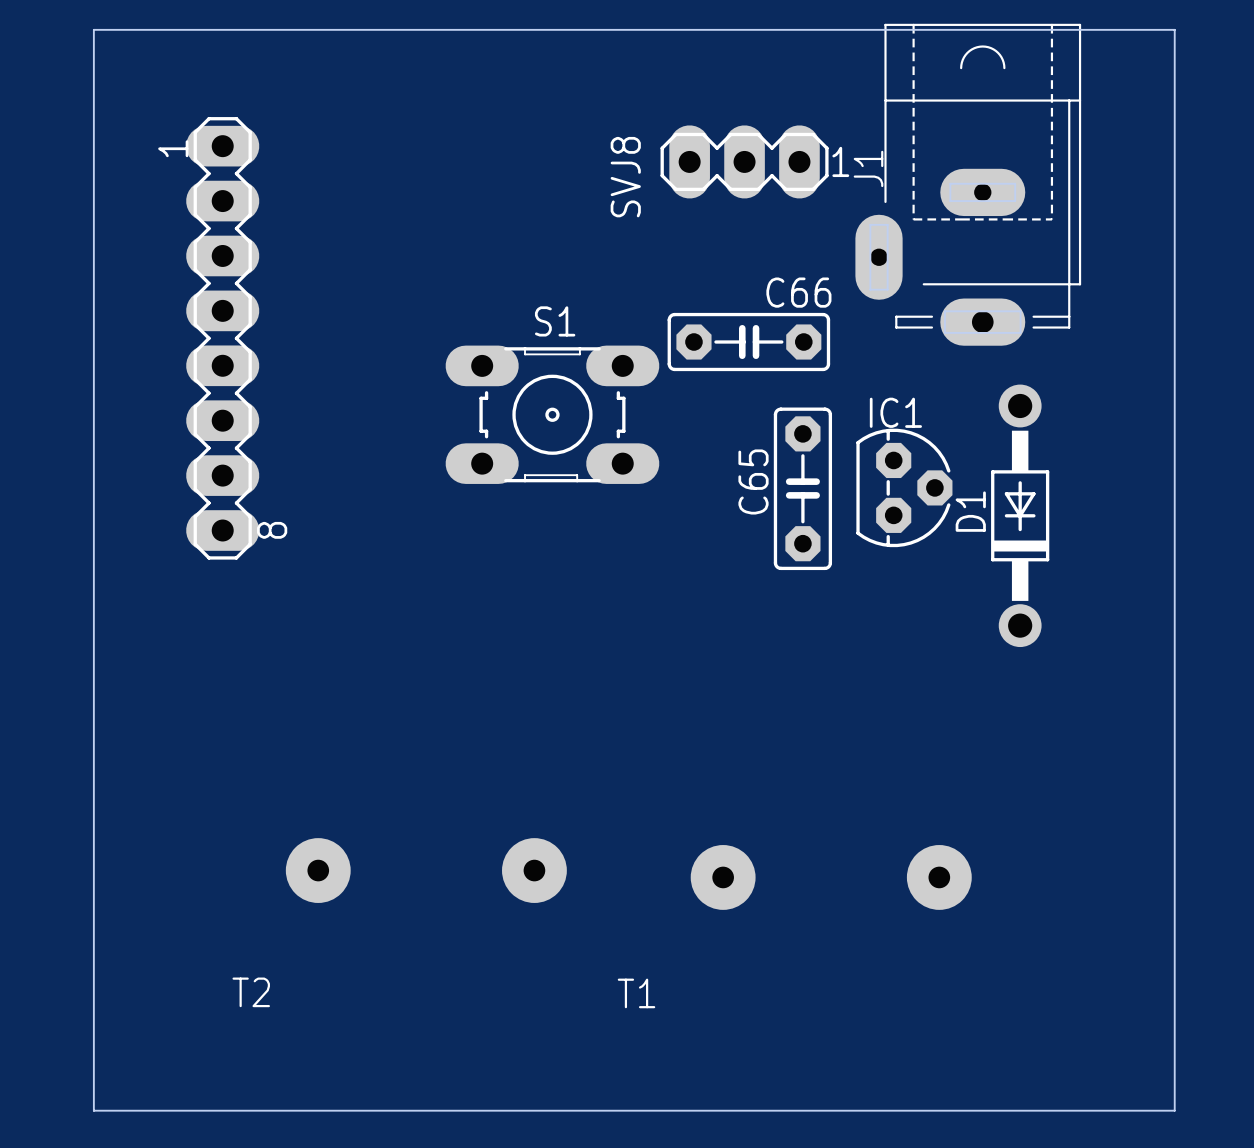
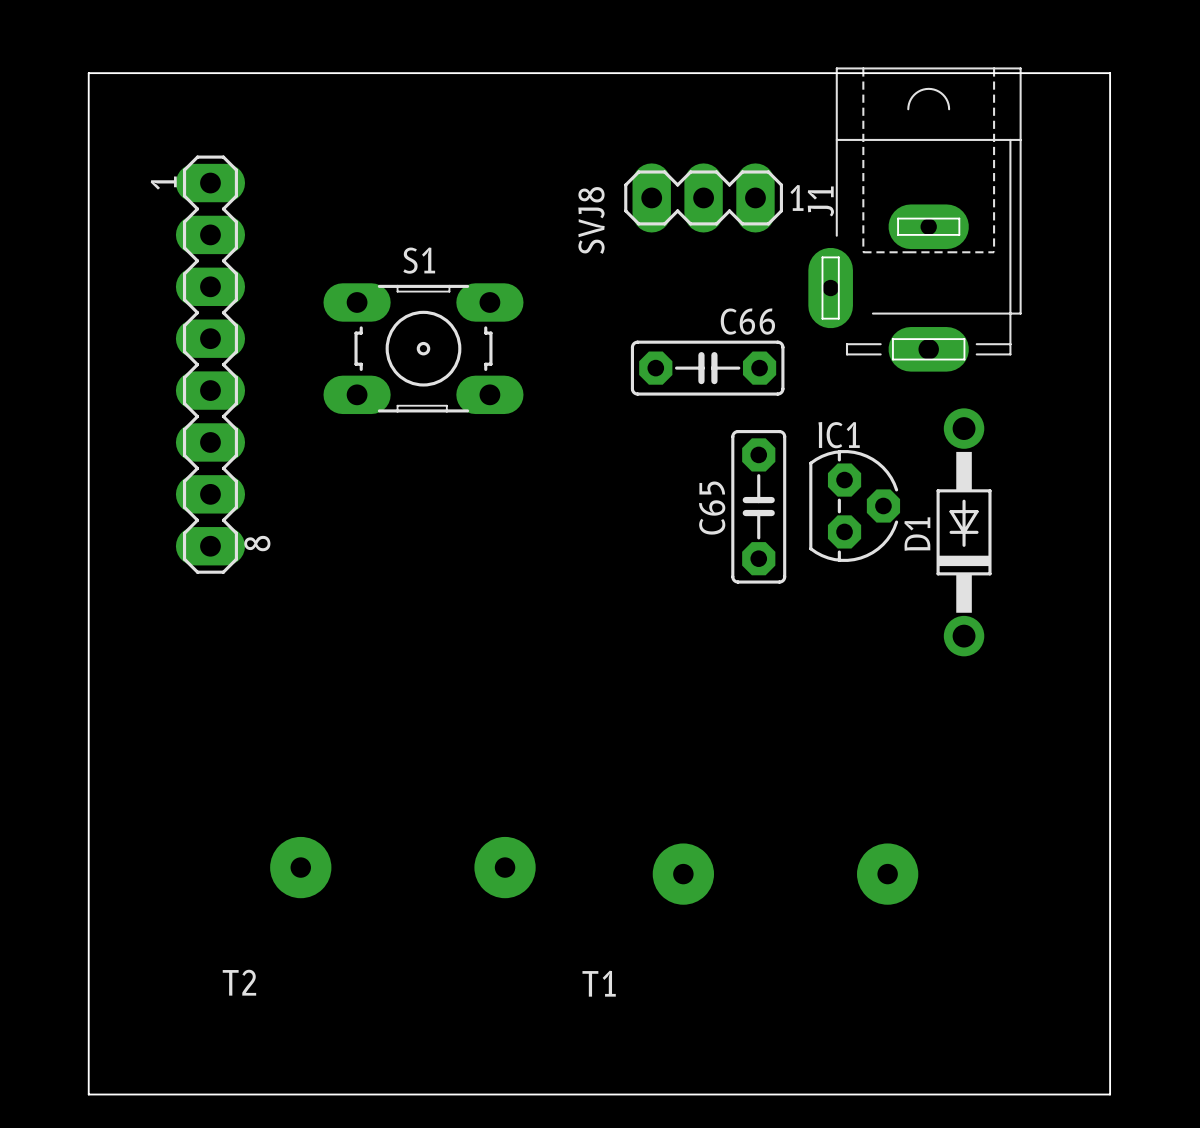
S1 footprint: [445, 345, 660, 484] -> [323, 283, 524, 415]

